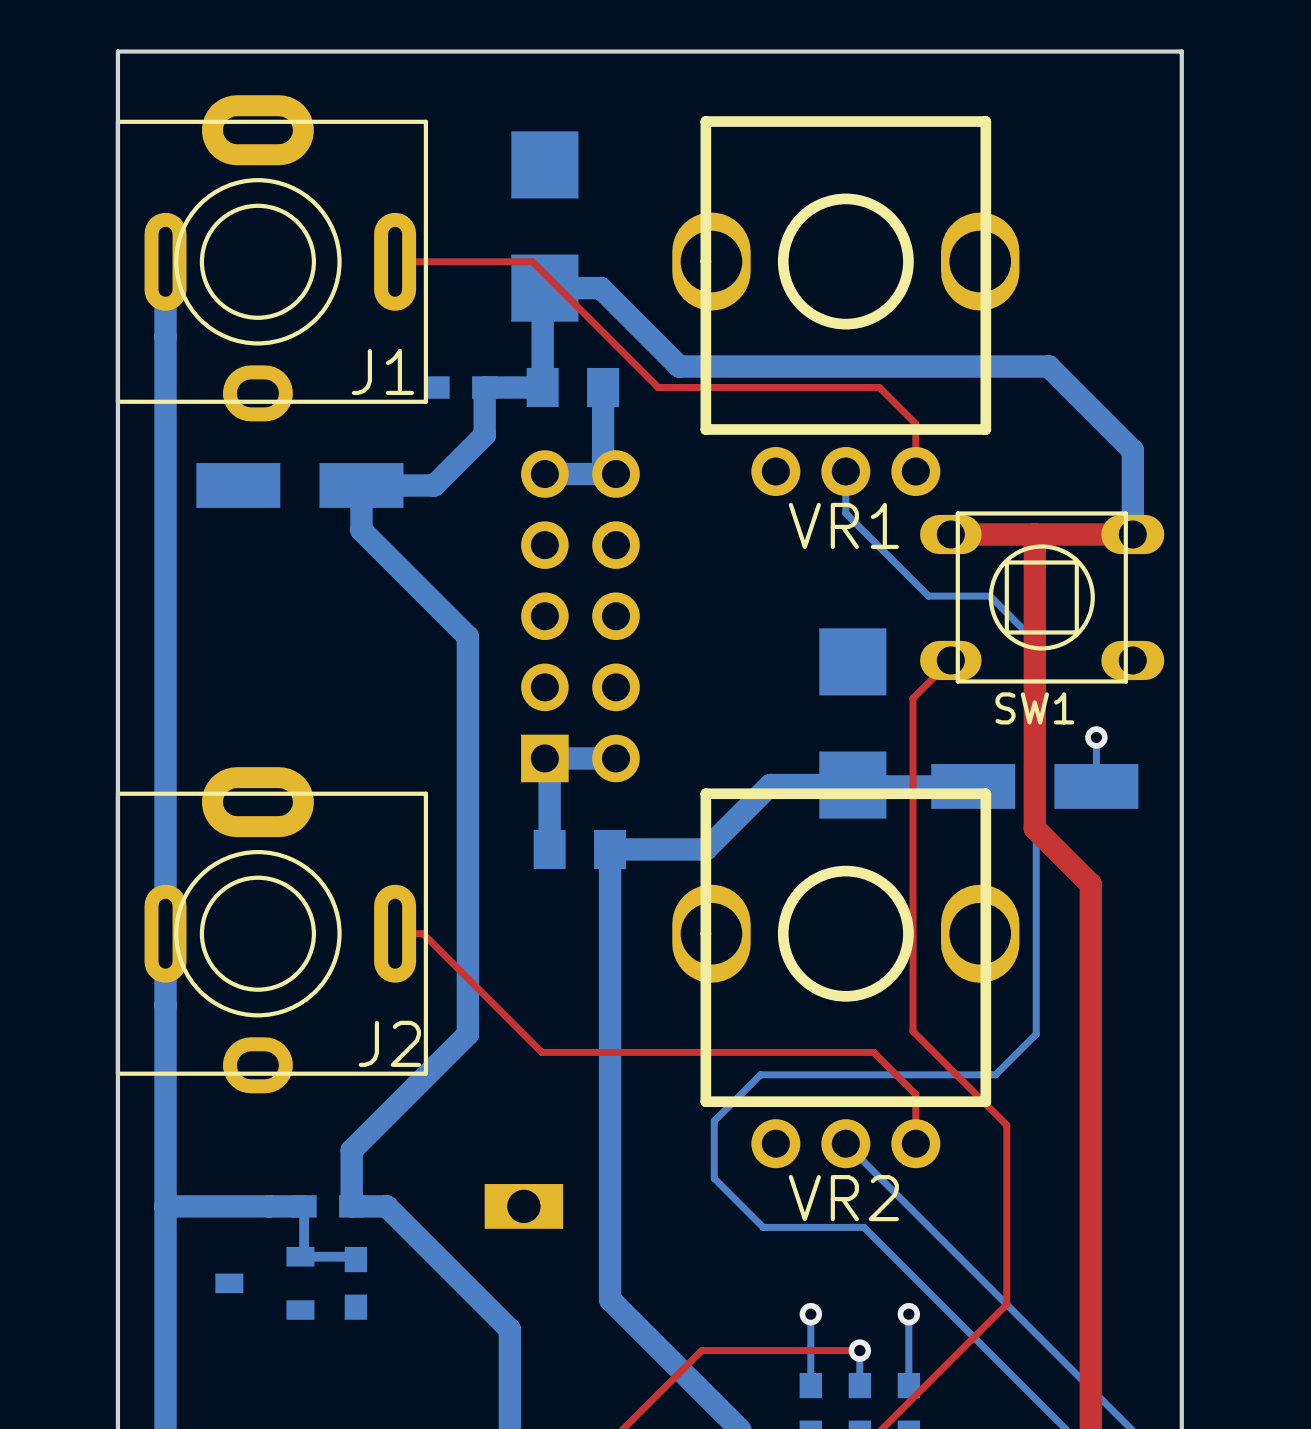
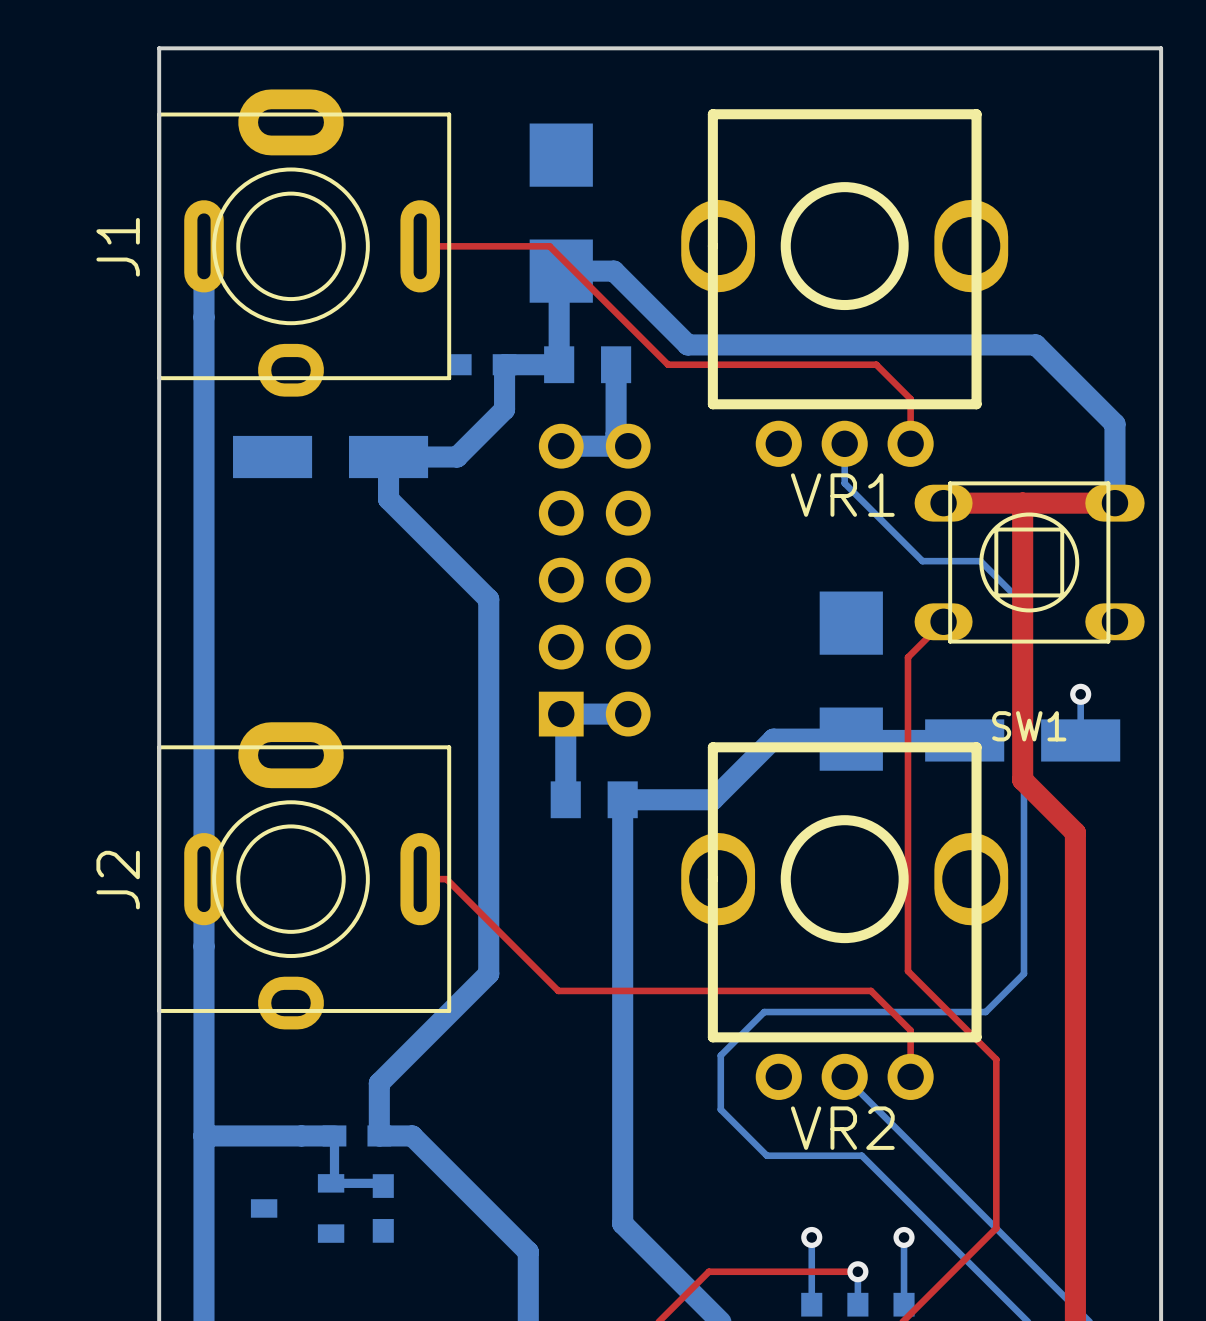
J1 name rotation: 0° (382, 371) -> 90° counterclockwise (118, 247)
J1 name position: J1 (382, 371) -> J1 (118, 247)
SW1 name position: SW1 (1034, 708) -> SW1 (1029, 726)
J2 name rotation: 0° (389, 1043) -> 90° counterclockwise (118, 880)
J2 name position: J2 (389, 1043) -> J2 (118, 880)
part: (523, 1206) -> none

